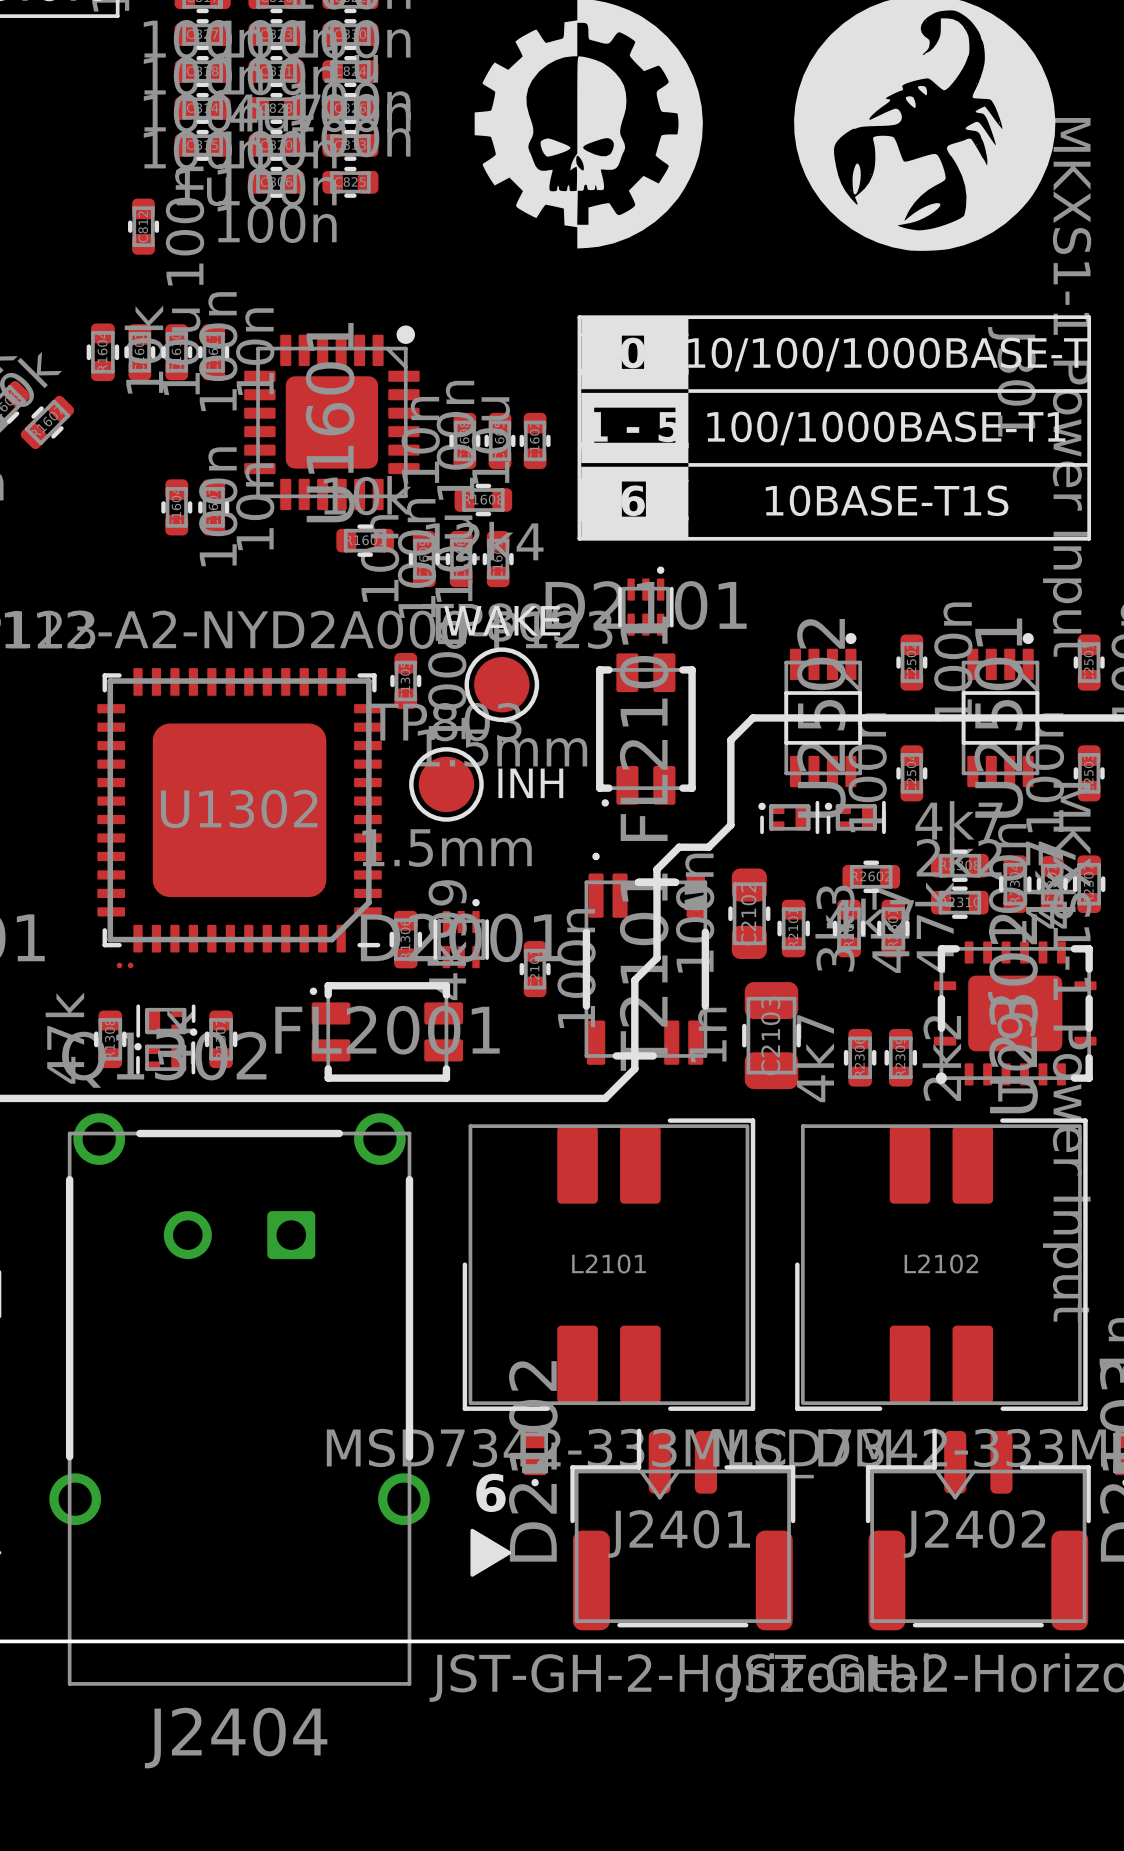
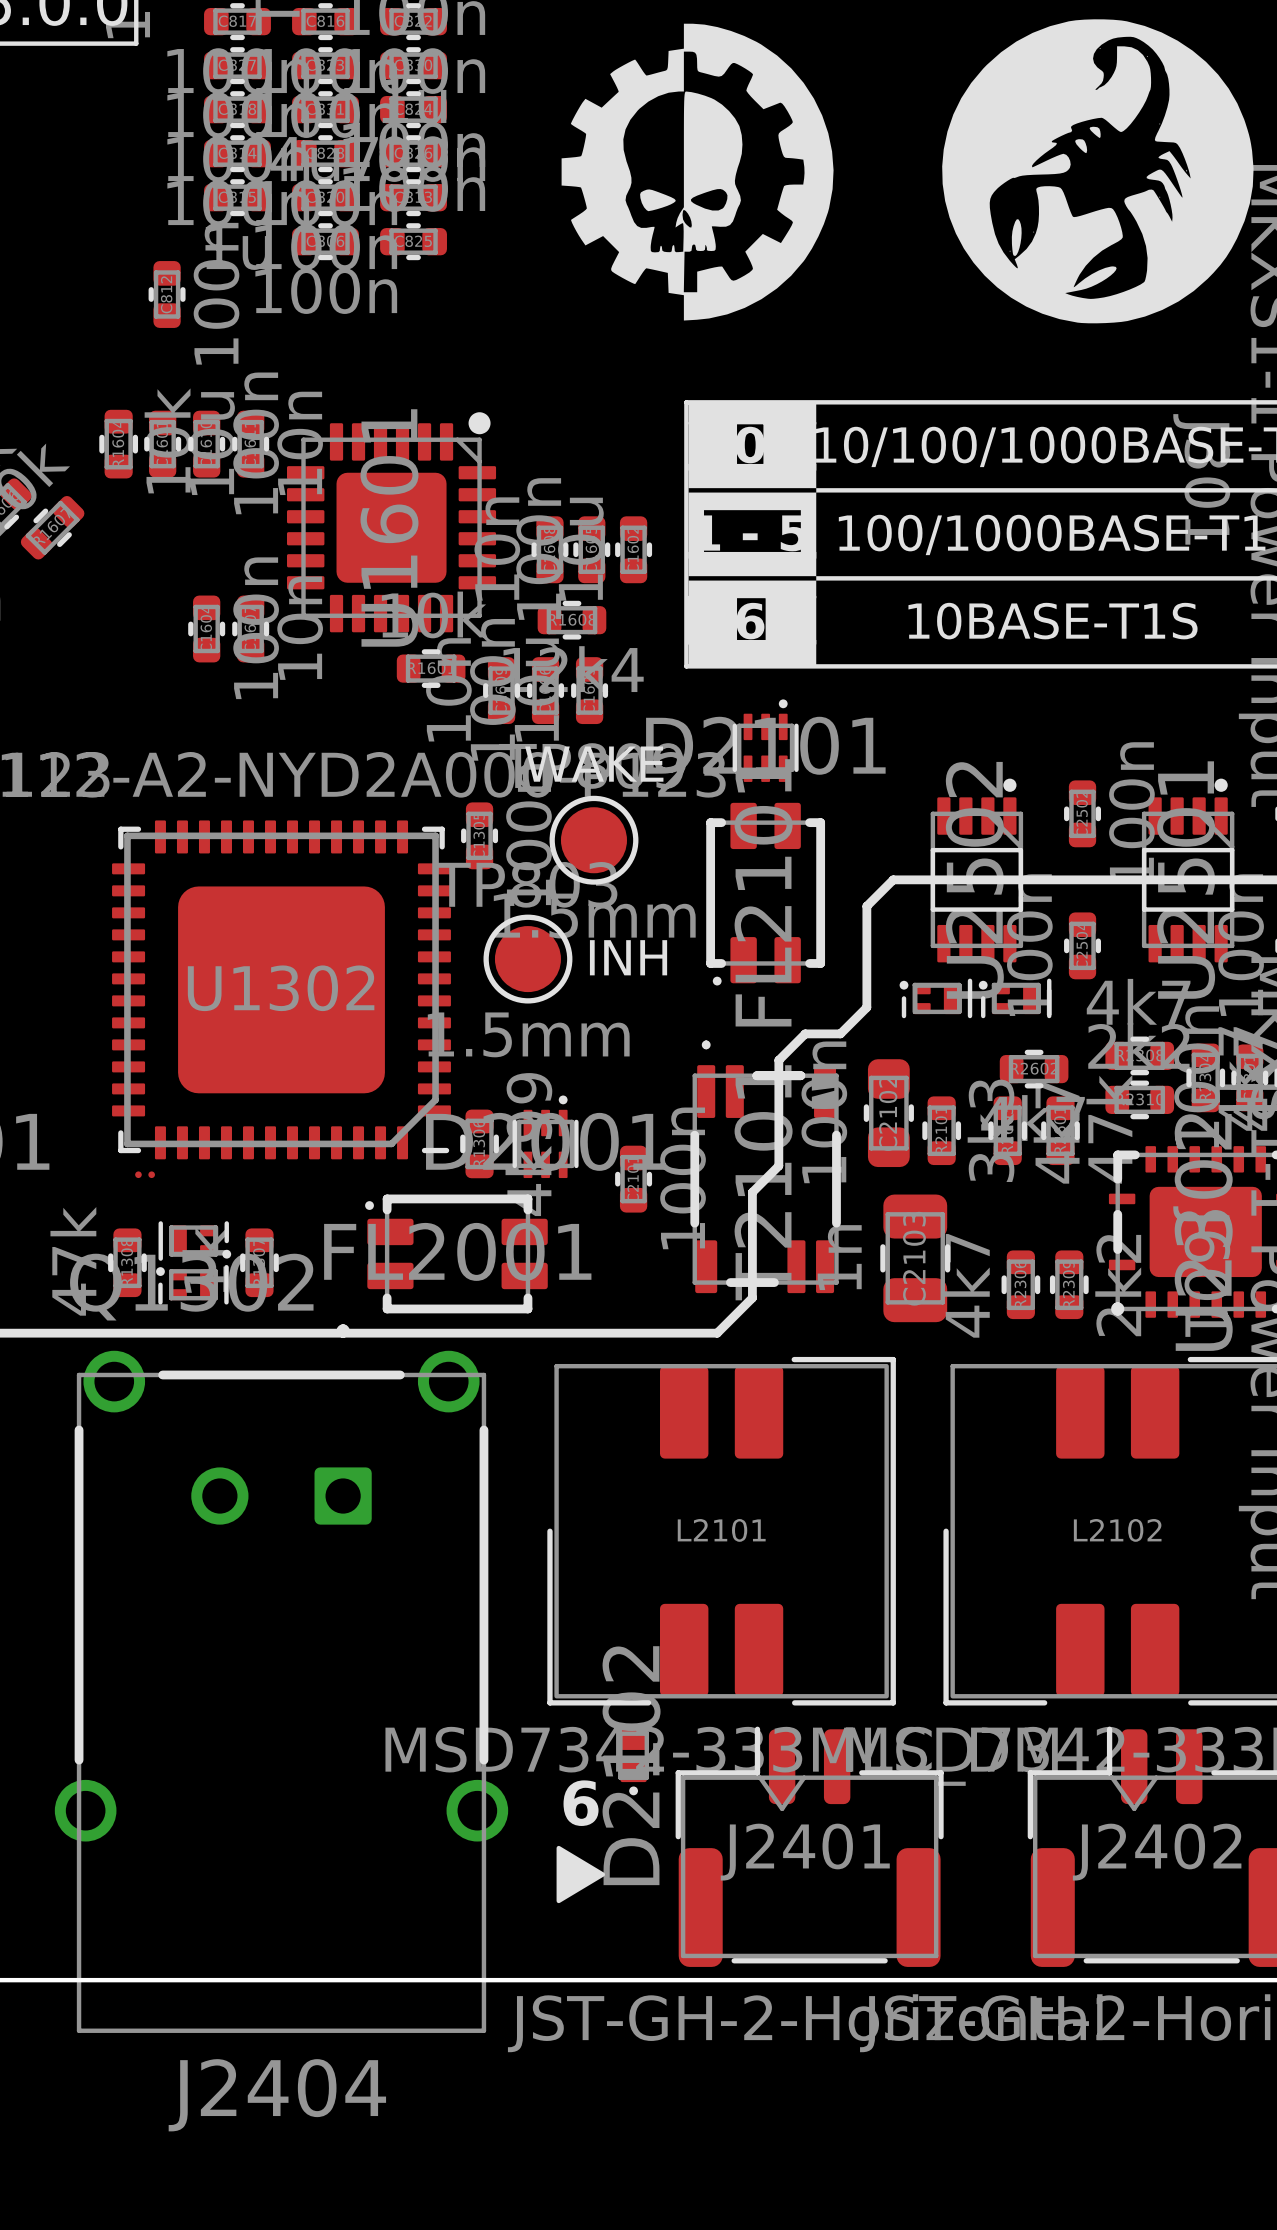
J2404 footprint: [49, 1113, 430, 1686] -> [54, 1324, 509, 2033]

